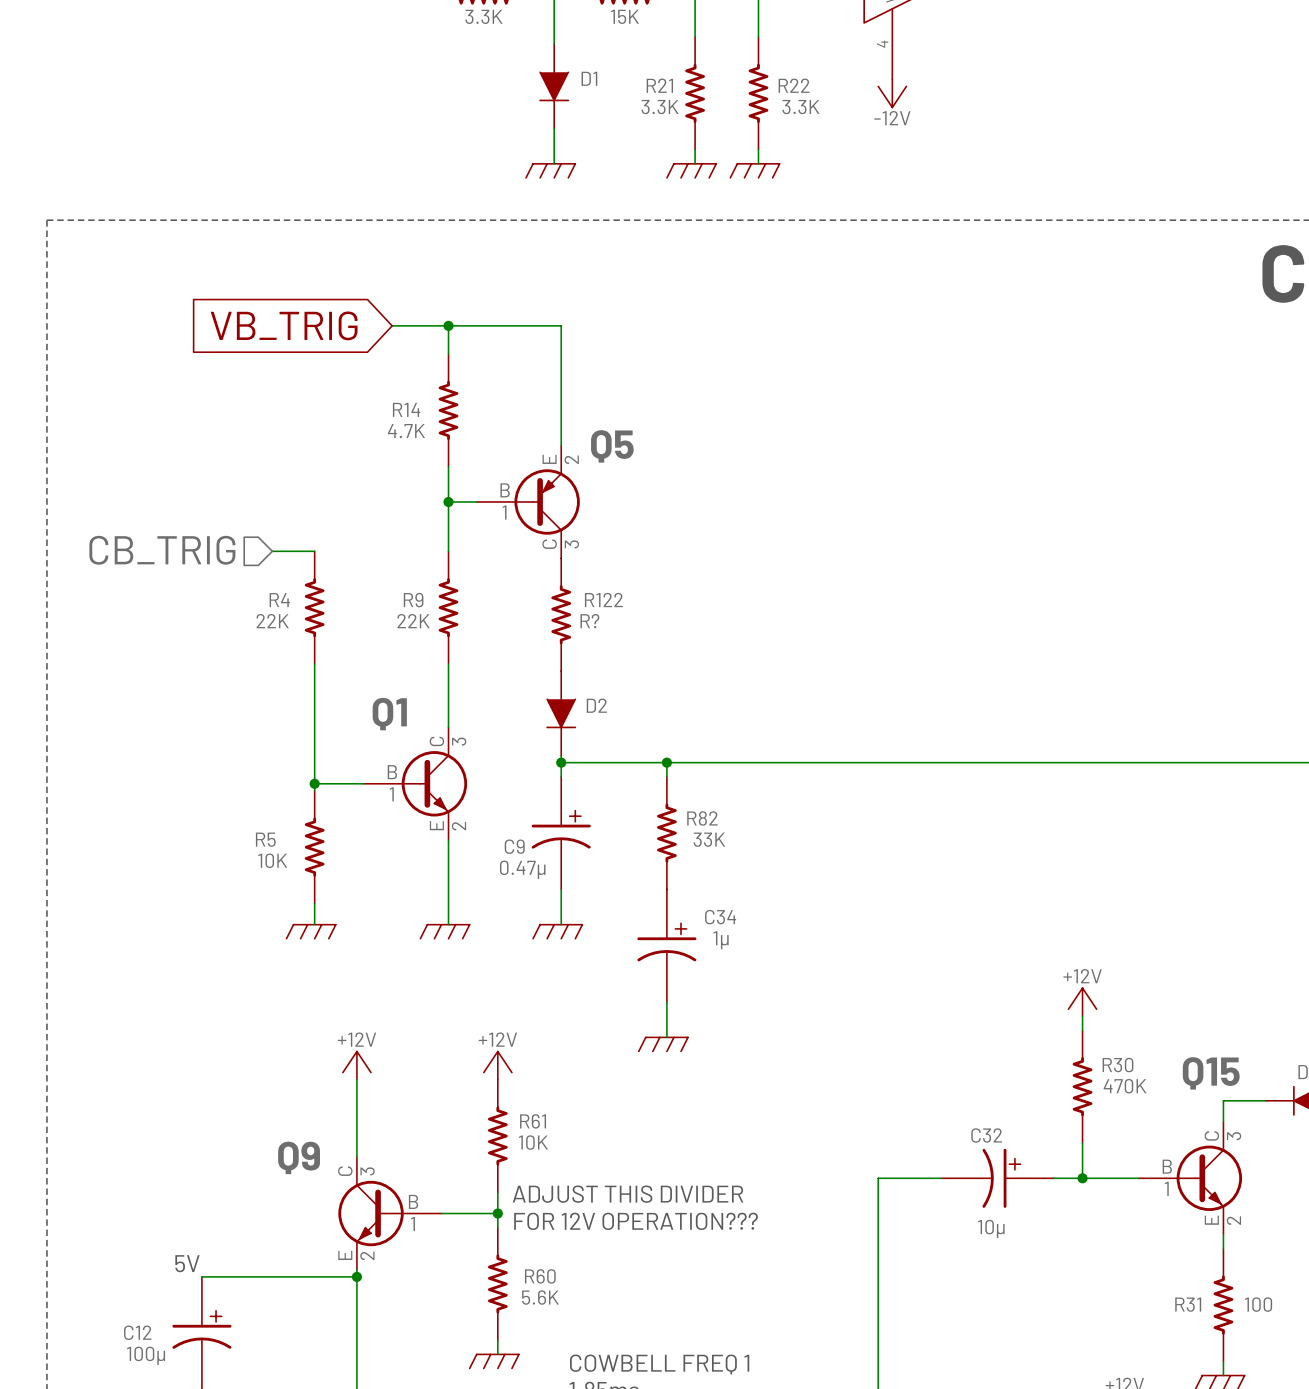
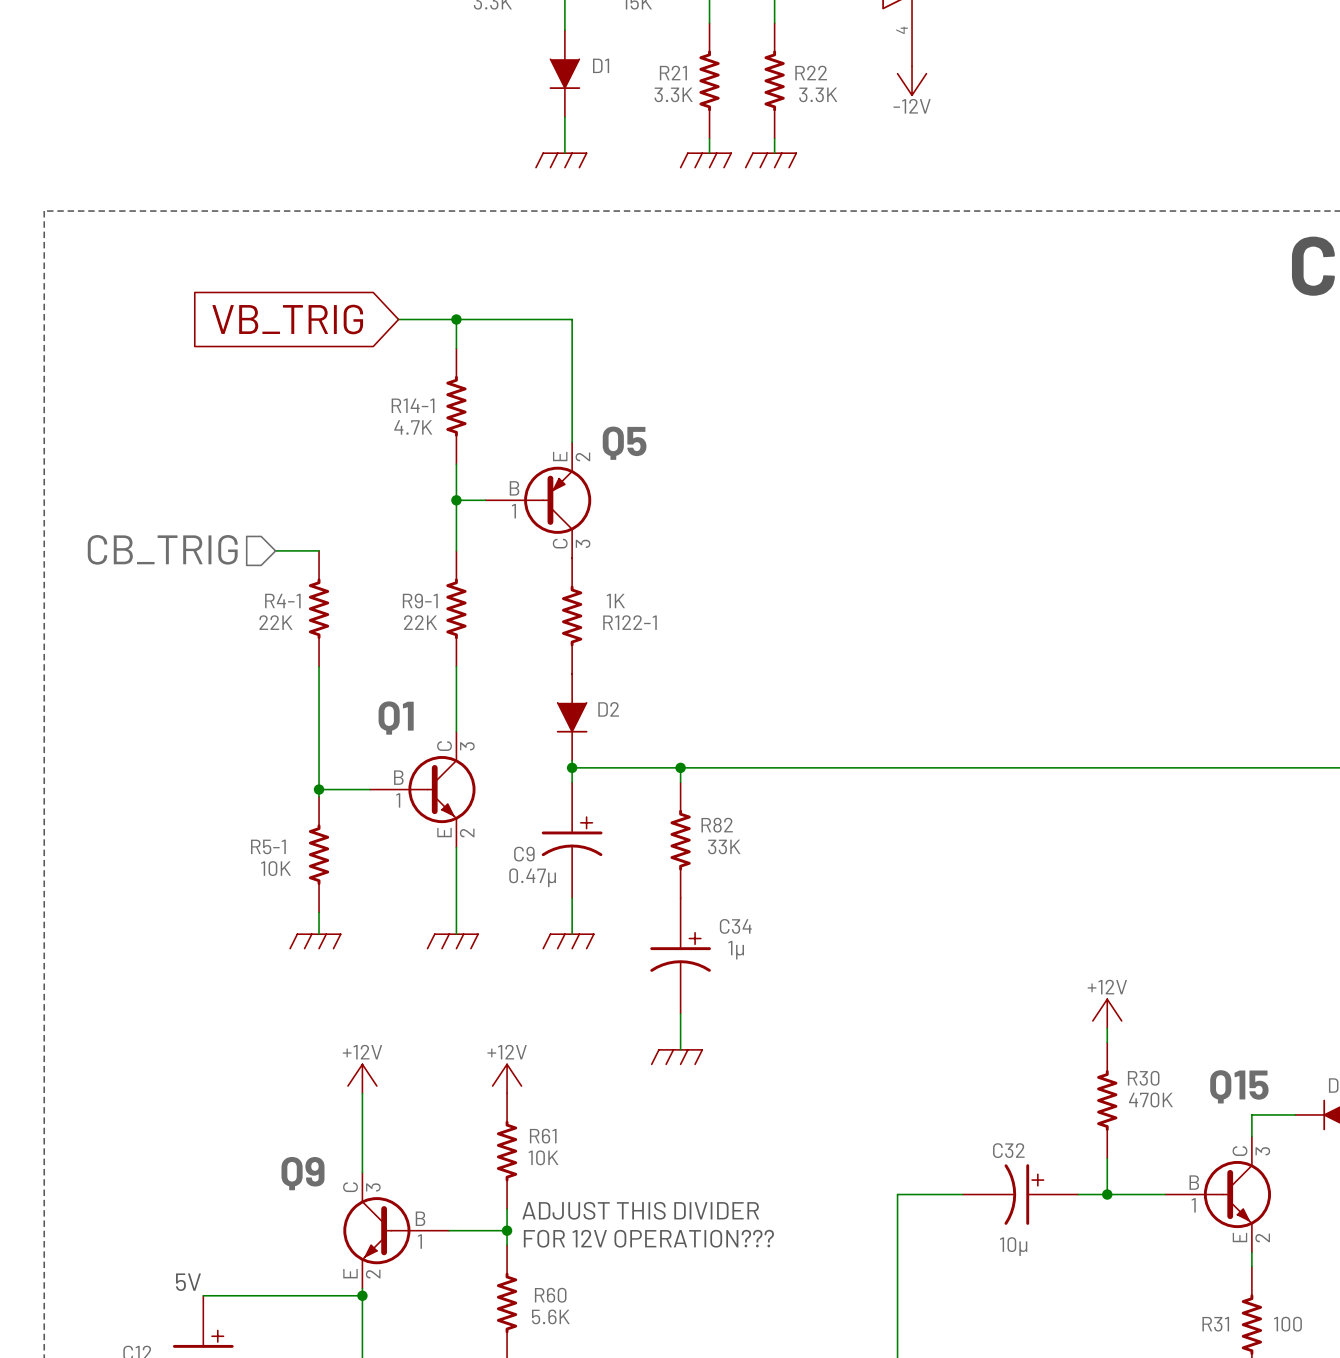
R14 name: R14 (406, 409) -> R14-1 (413, 405)
R4 name: R4 (279, 600) -> R4-1 (282, 600)
R9 name: R9 (413, 600) -> R9-1 (420, 601)
R? value: R122 (603, 600) -> 1K (615, 600)
R? name: R? (589, 621) -> R122-1 (629, 622)
R5 name: R5 (265, 839) -> R5-1 (268, 846)

